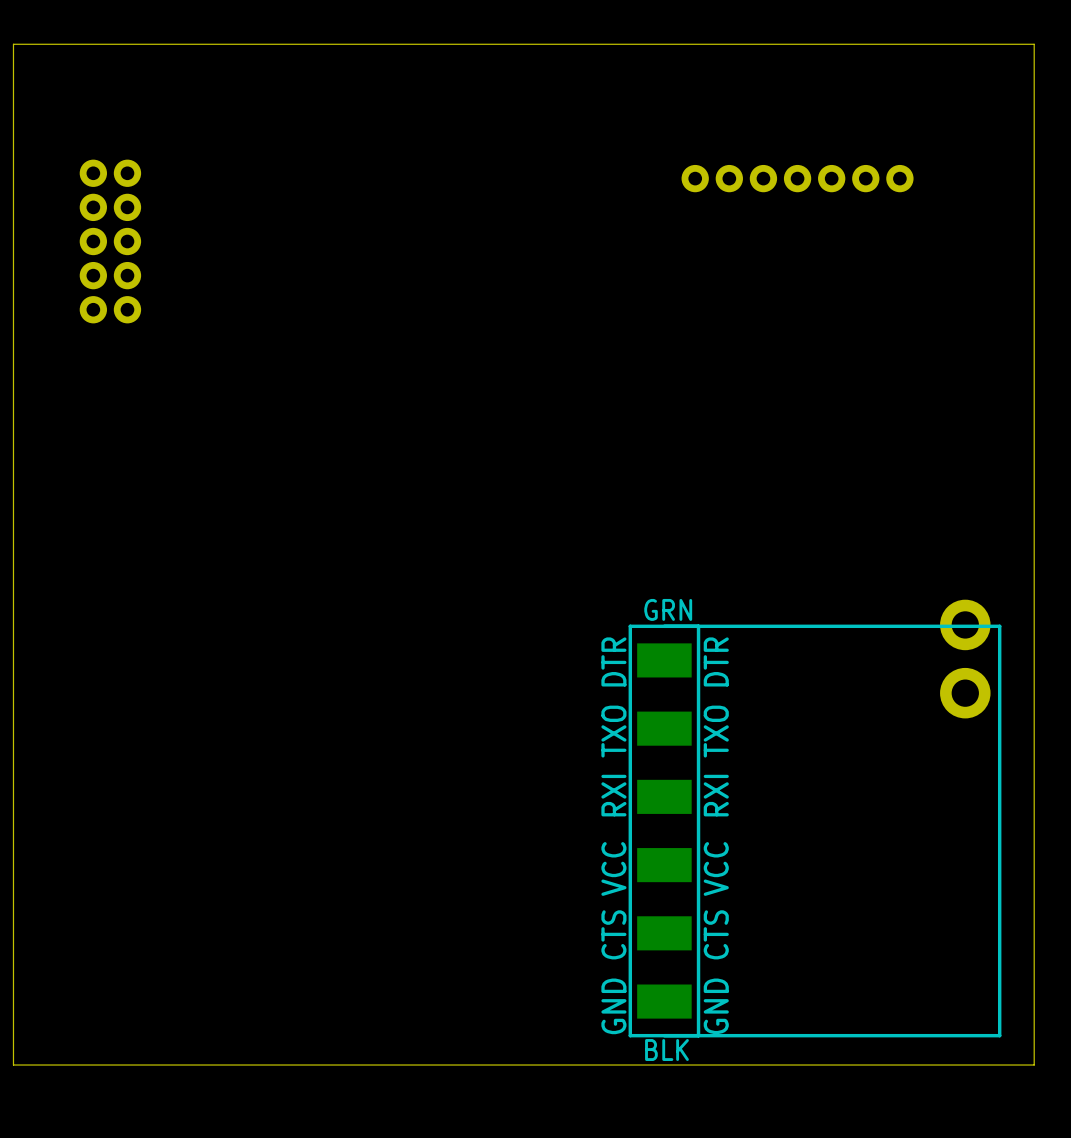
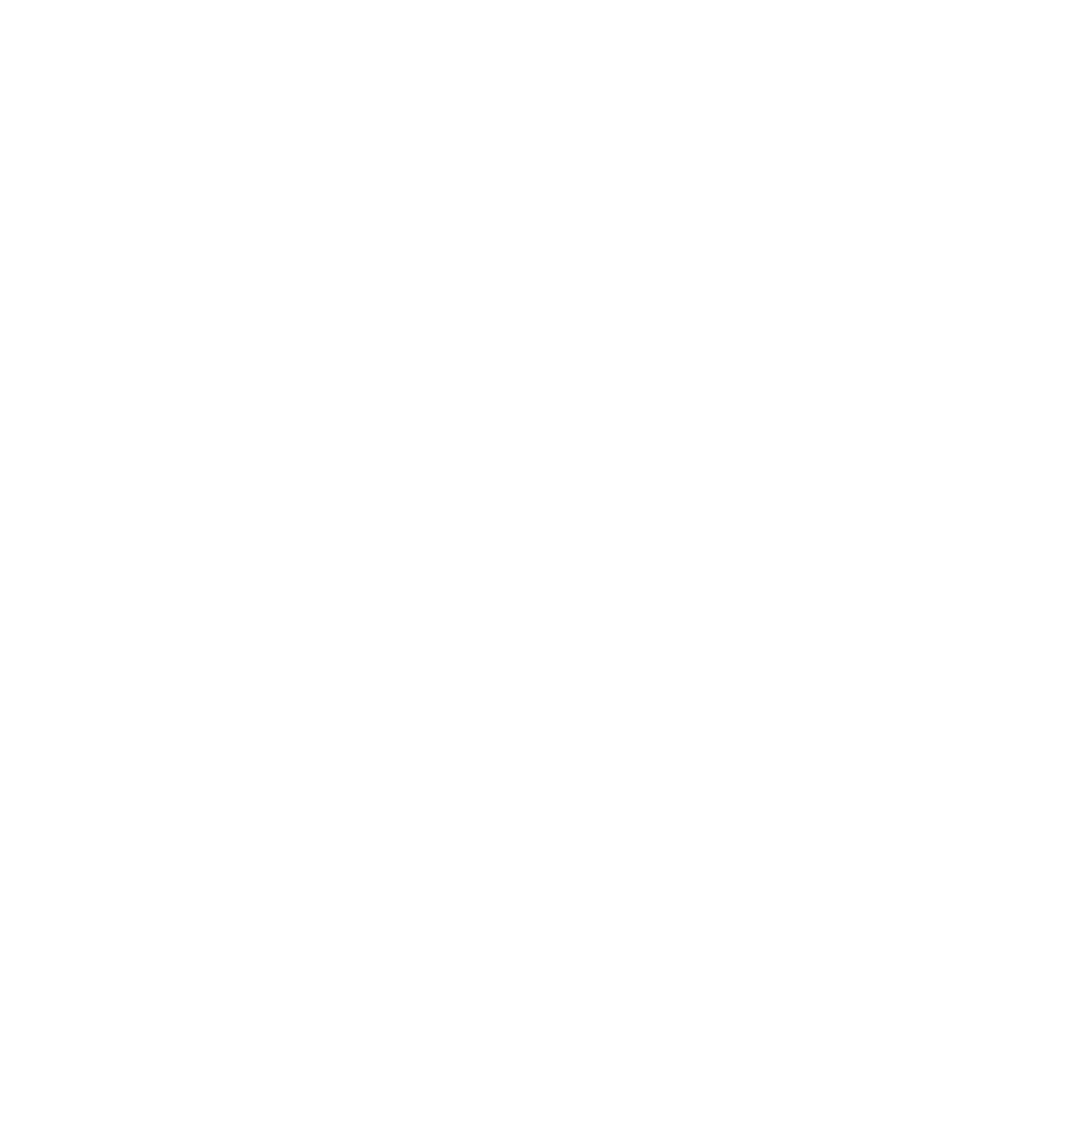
board edge: (1034, 44) (13, 44) (13, 1065) (1034, 1065) (1034, 44) -> none
part: (797, 178) -> none
part: (110, 241) -> none
part: (965, 659) -> none
part: (815, 830) -> none

